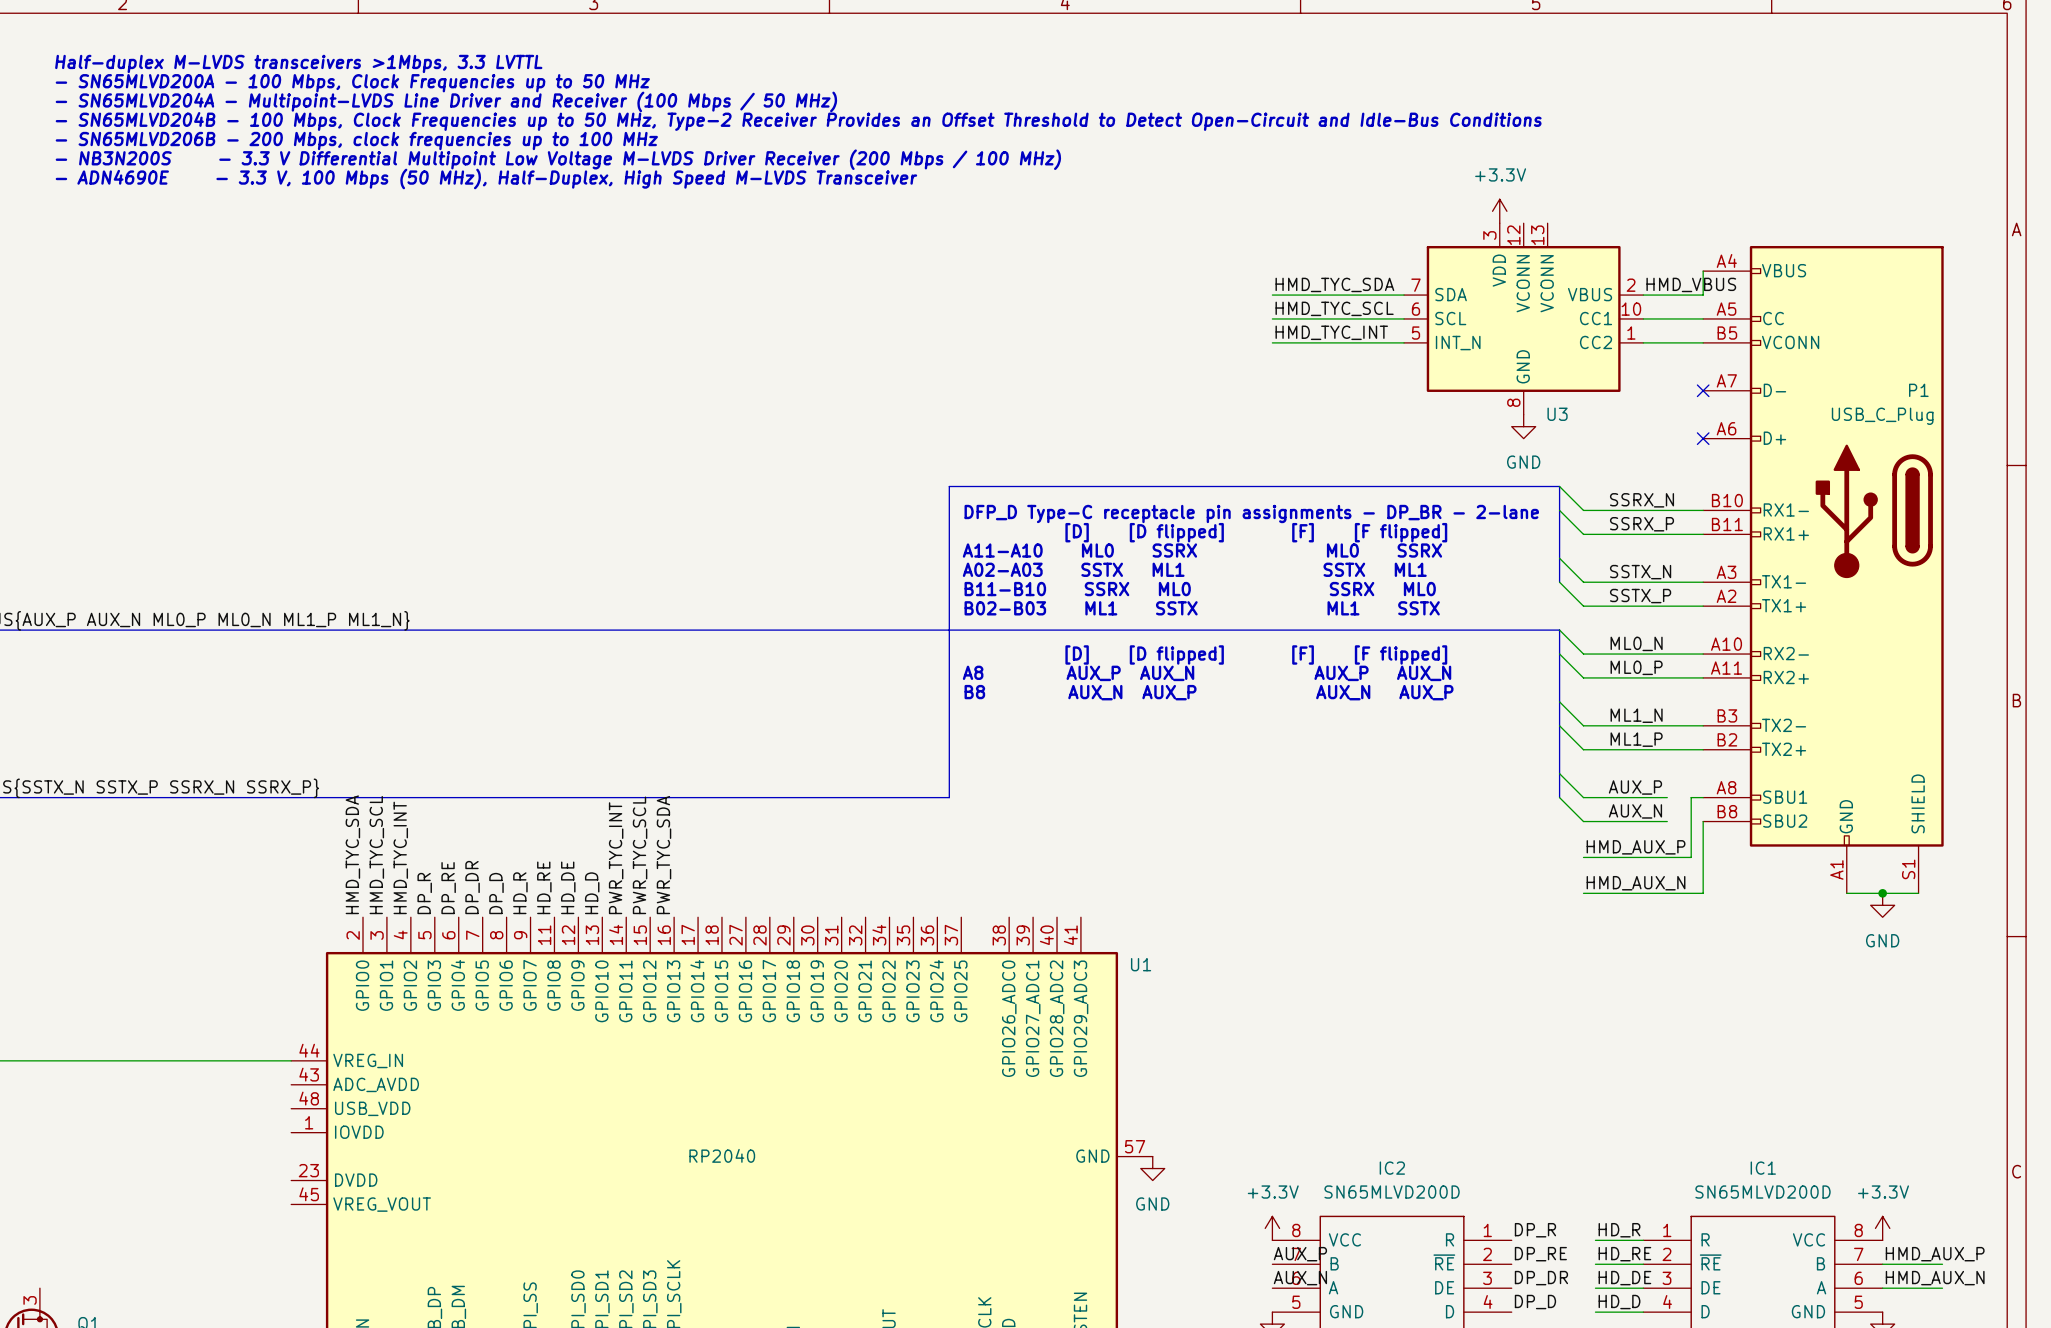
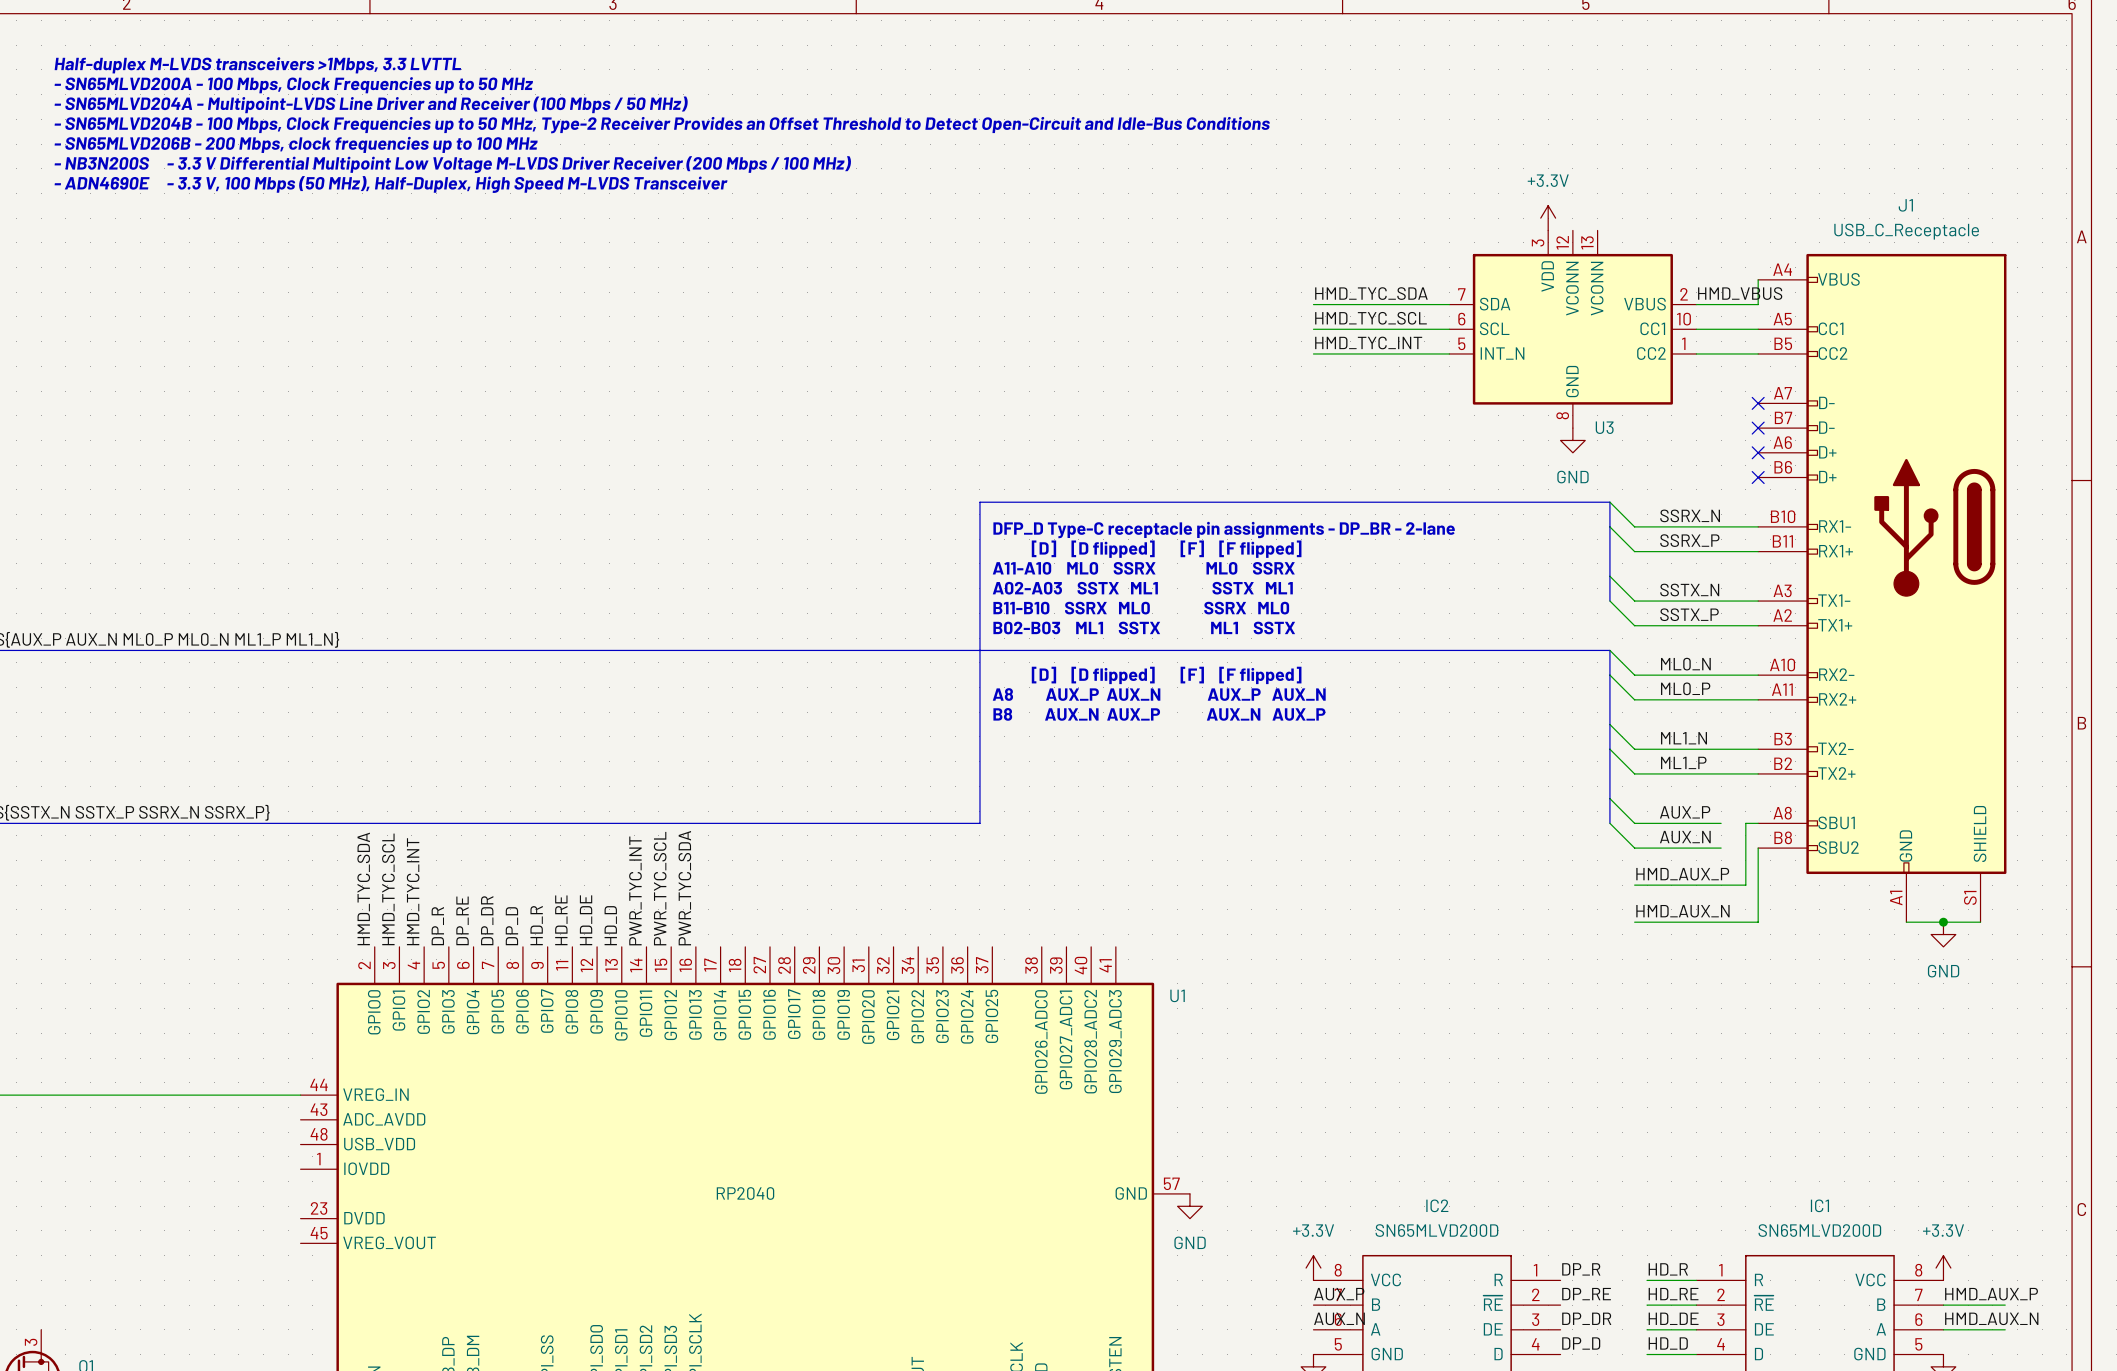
no-connect mark: none -> (1758, 428)
no-connect mark: none -> (1758, 477)
P1: USB_C_Plug (1823, 569) -> none
J1: none -> USB_C_Receptacle (1882, 588)

